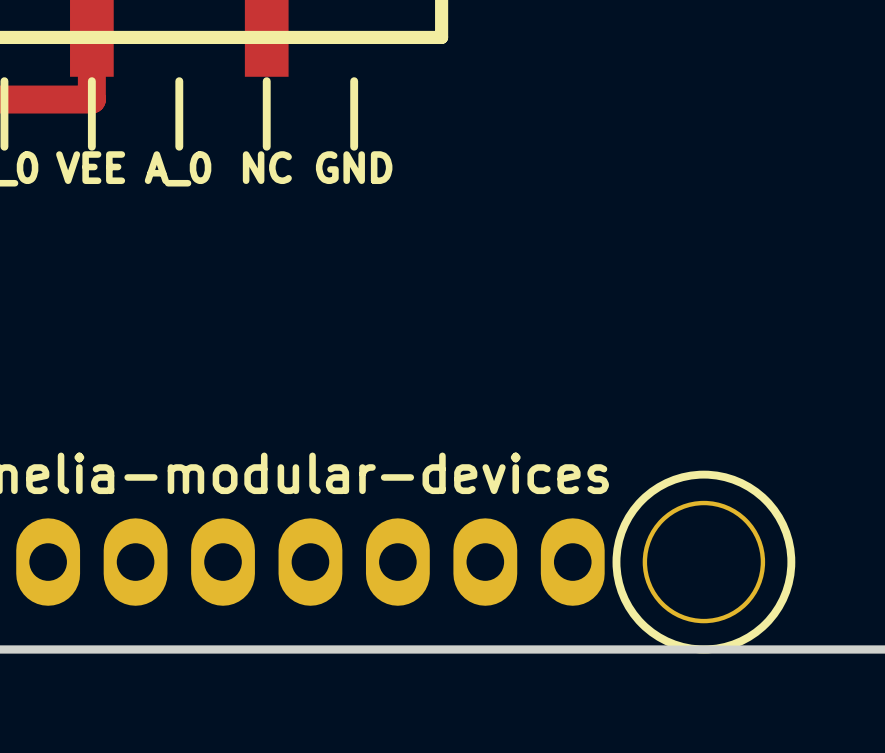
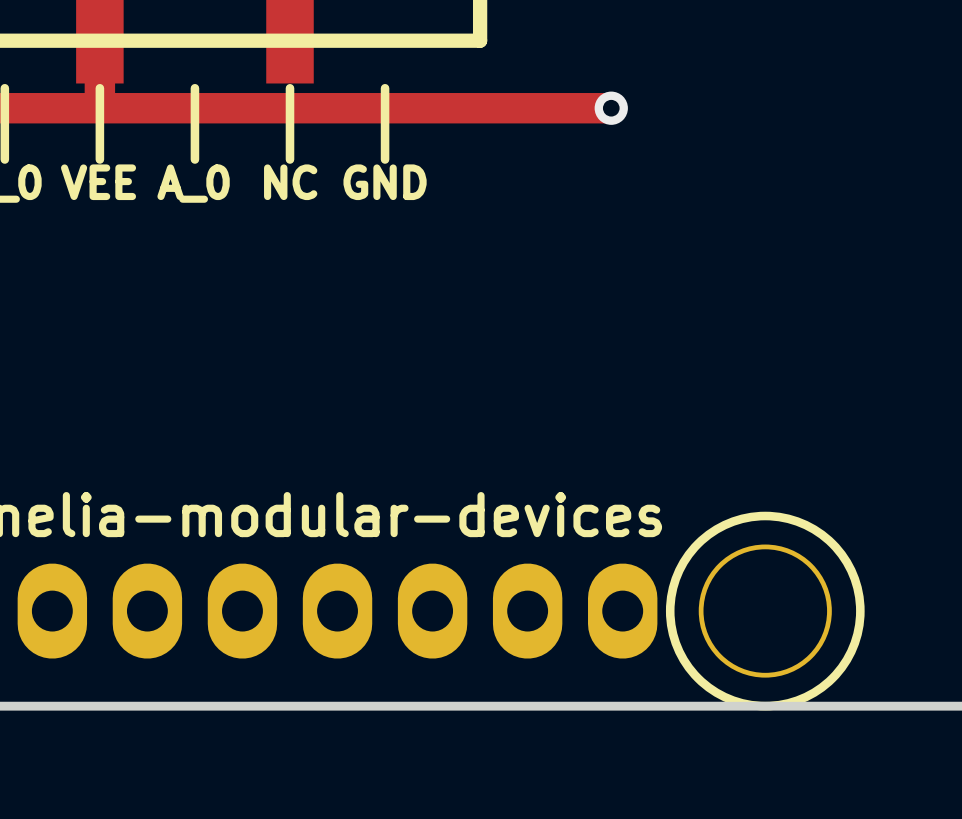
track: none -> (99, 108) (611, 108)
via: none -> (611, 108)

